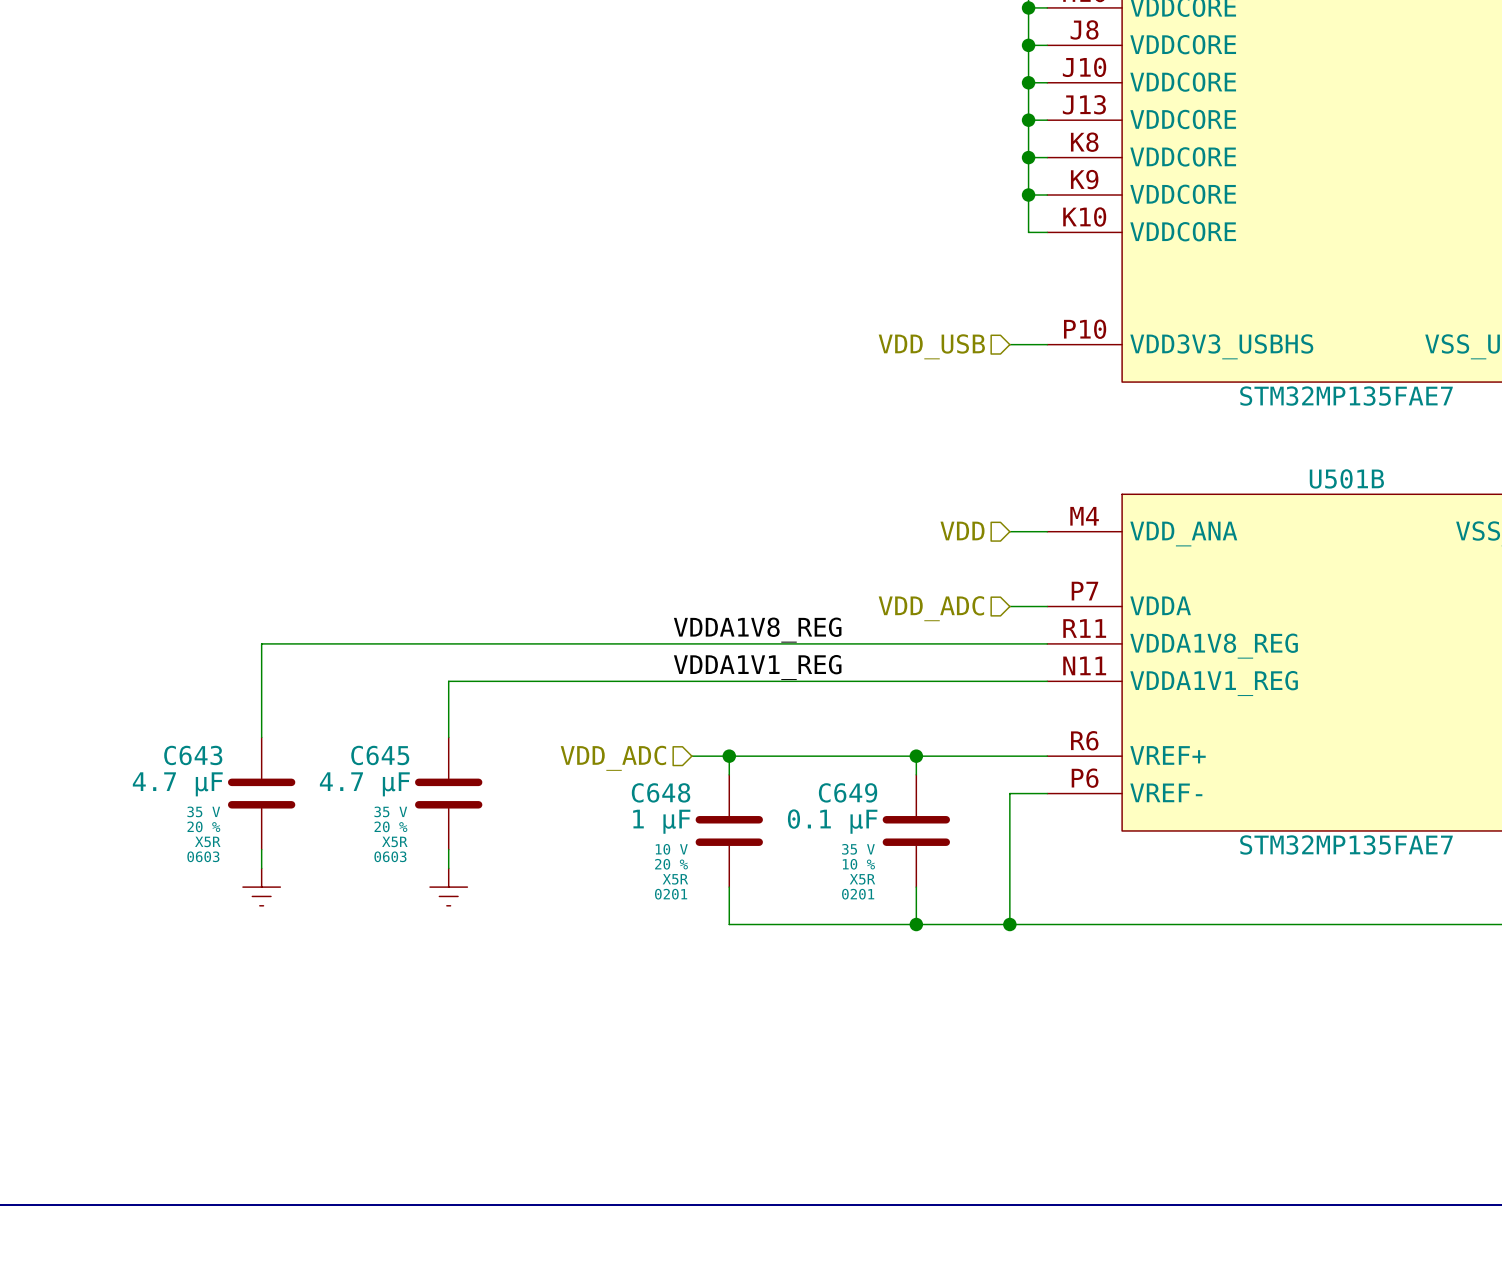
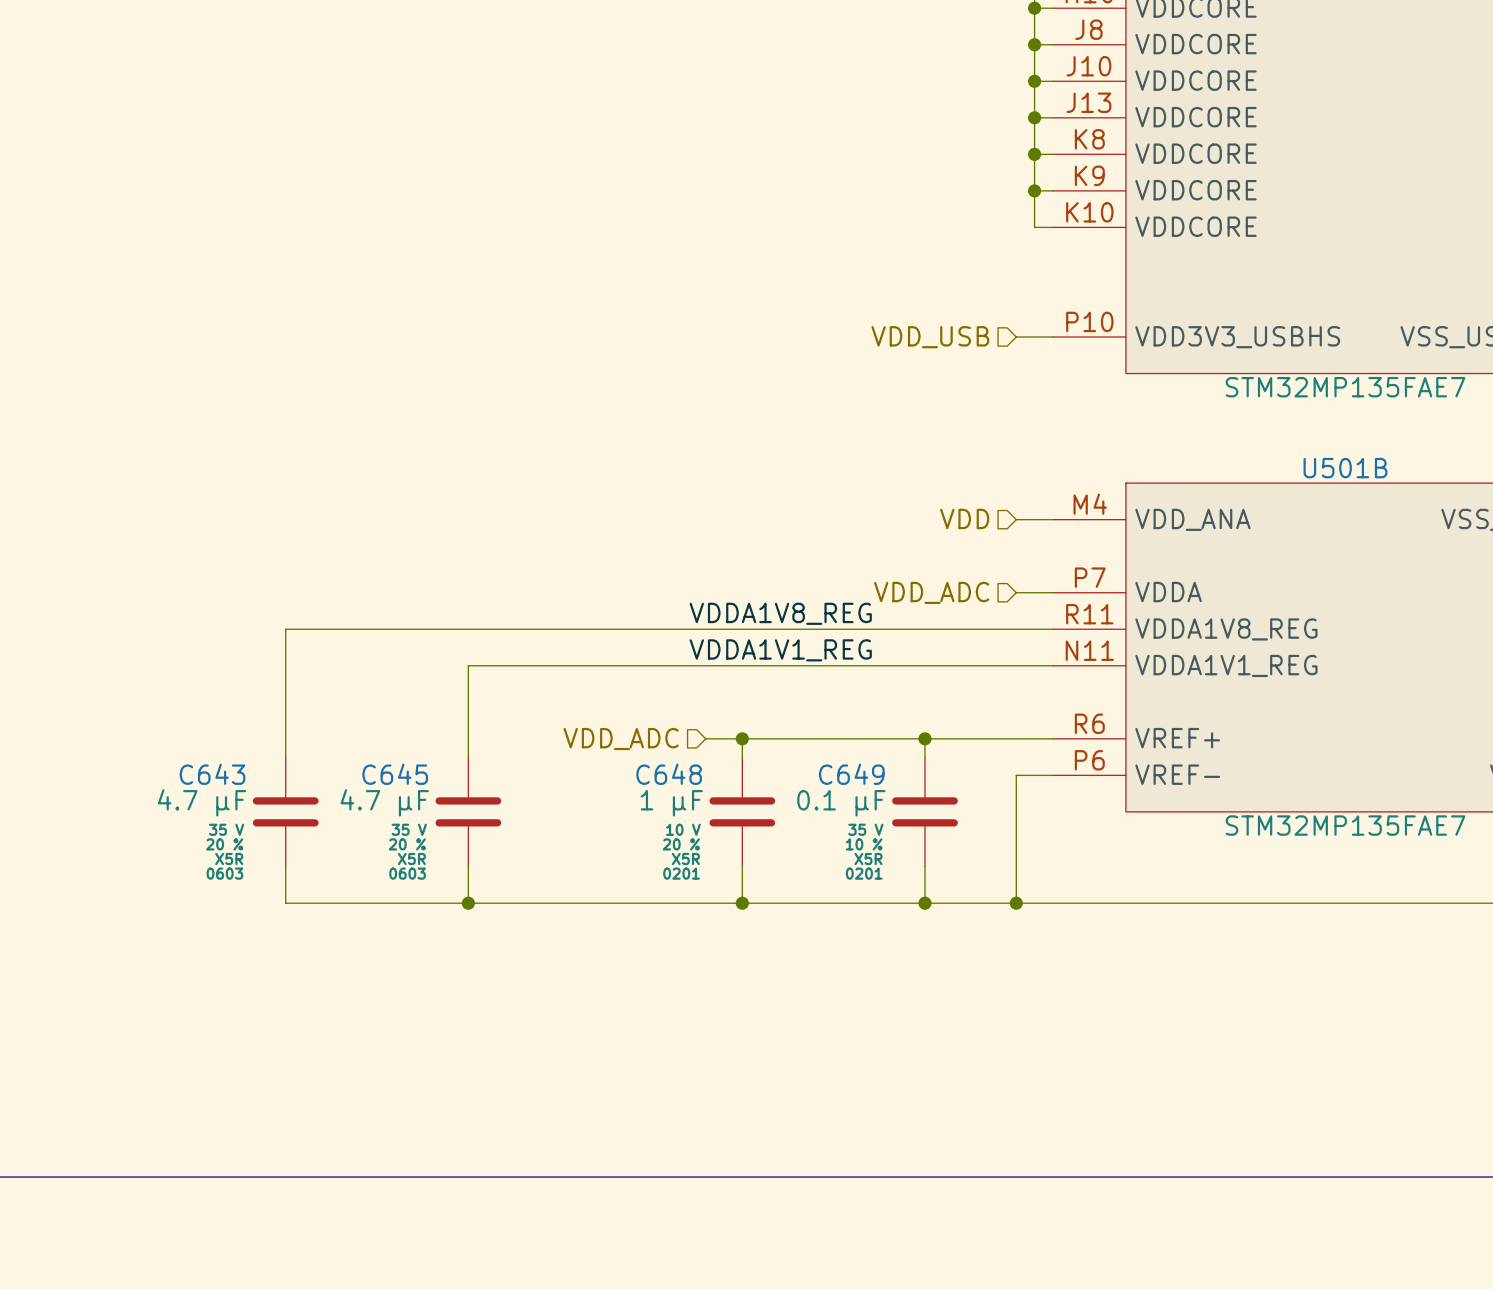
C643 position: (261, 793) -> (285, 811)
C645 position: (448, 793) -> (468, 811)
wire: none -> (285, 866) (285, 903) (742, 903)
power symbol: (261, 887) -> none
wire: none -> (468, 866) (468, 903)
power symbol: (448, 887) -> none
junction: none -> (468, 903)
junction: none -> (742, 903)

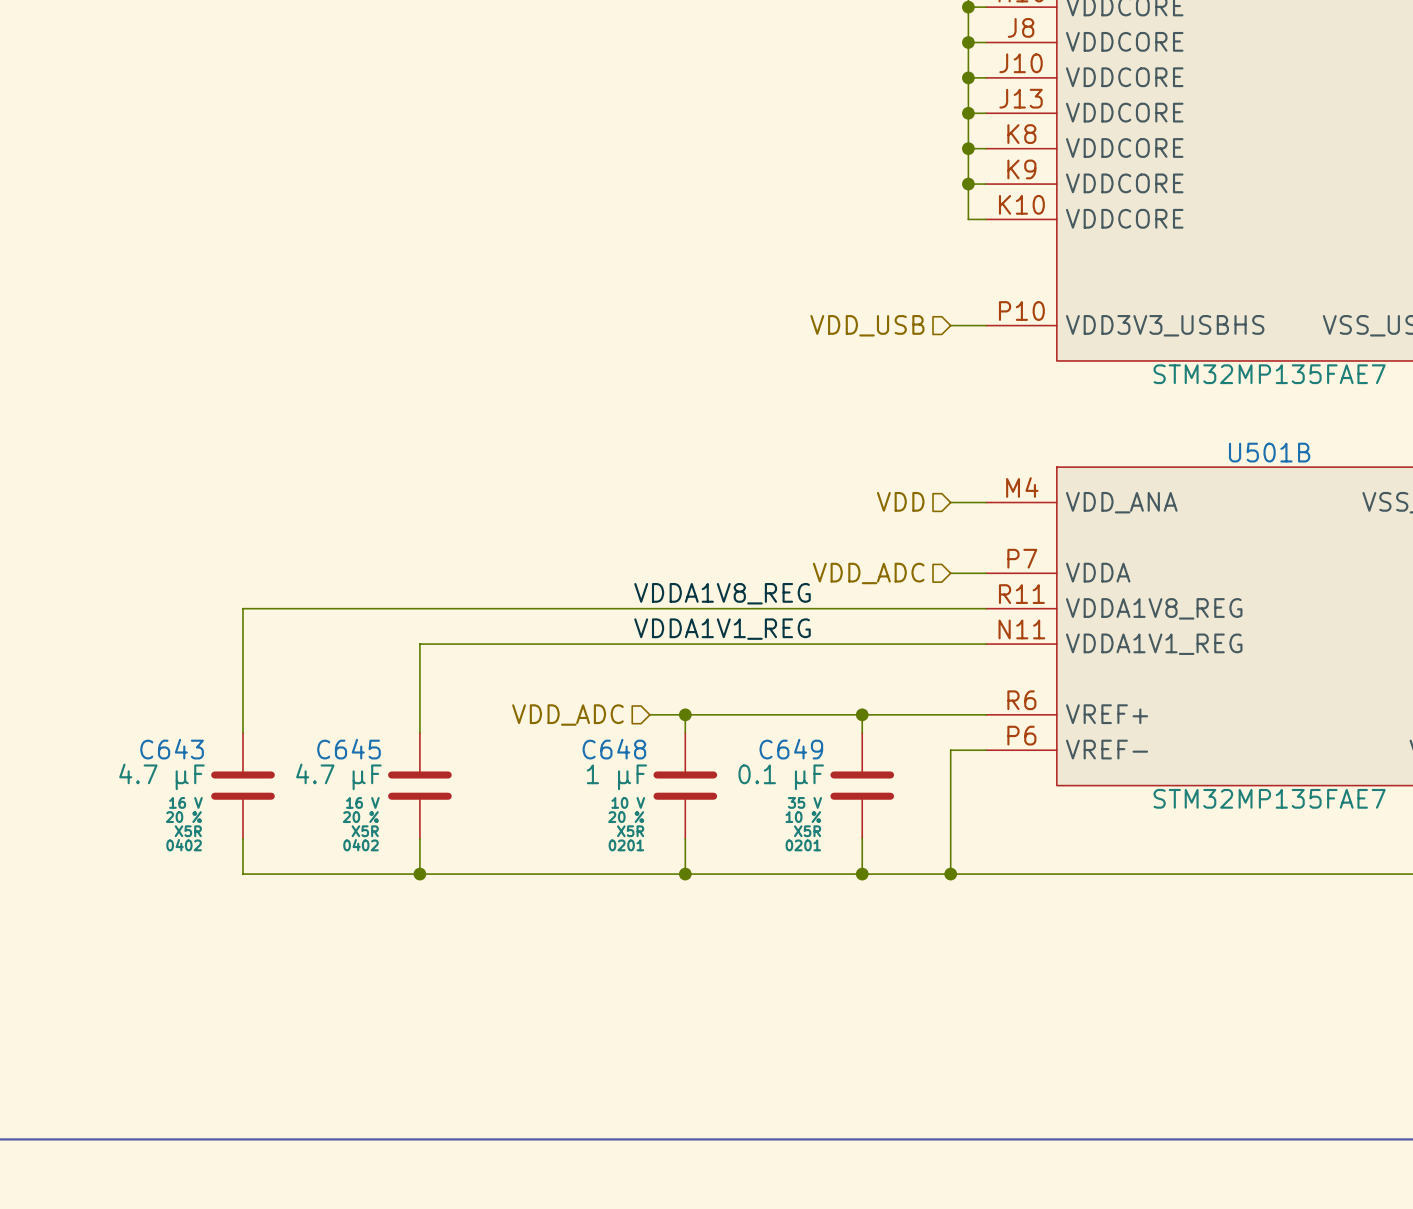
C643 text: 35 V (226, 829) -> 16 V (185, 802)
C645 text: 35 V (409, 829) -> 16 V (362, 802)
C643 text: 0603 (224, 873) -> 0402 (184, 845)
C645 text: 0603 (407, 873) -> 0402 (361, 845)

